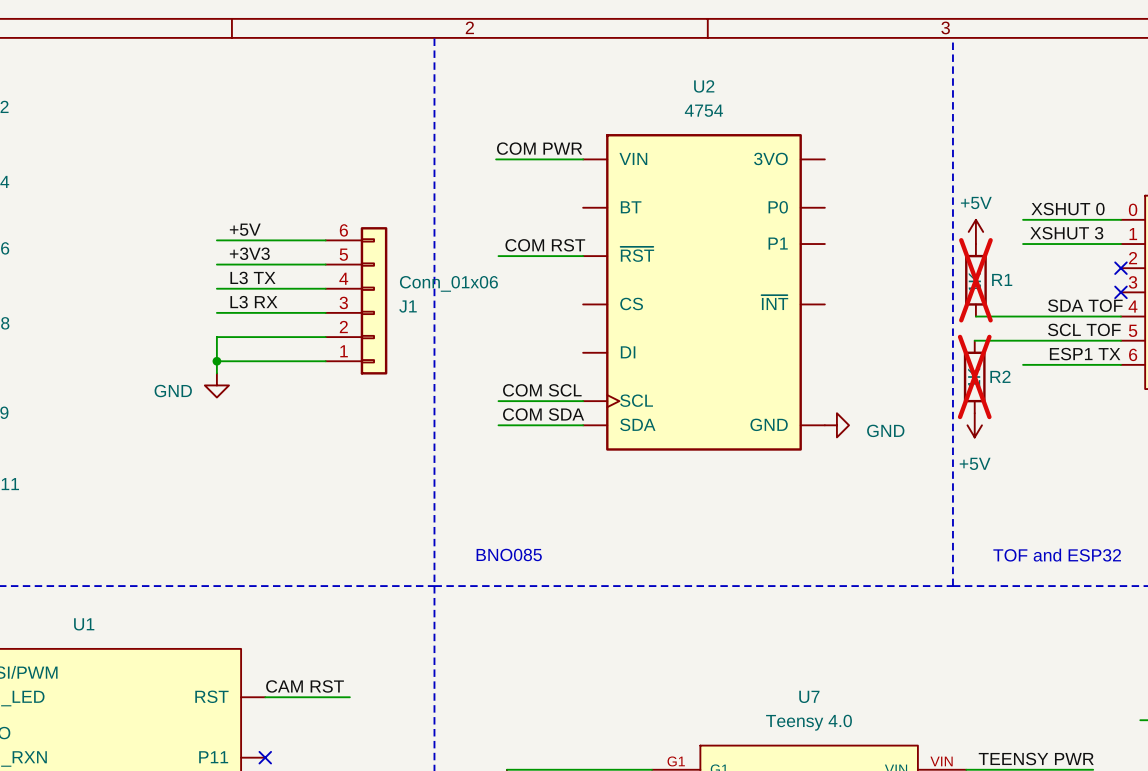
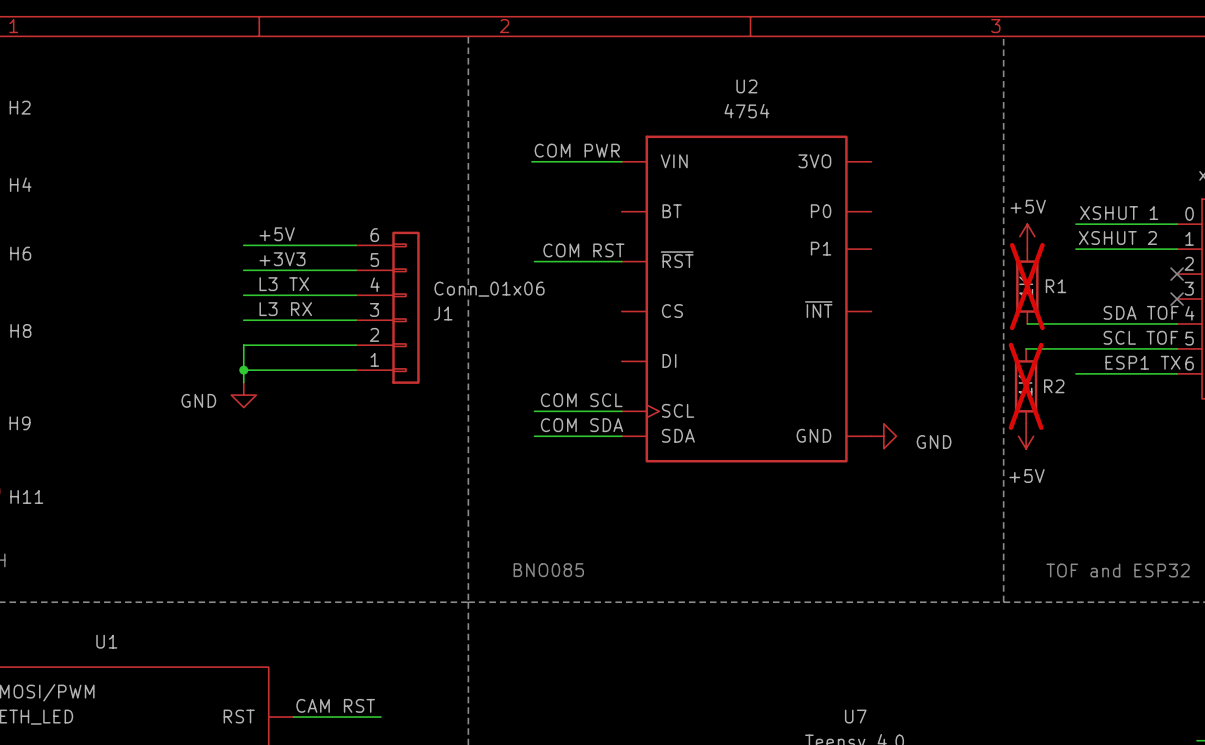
label: XSHUT 0 (1068, 209) -> XSHUT 1 (1119, 213)
label: XSHUT 3 (1066, 233) -> XSHUT 2 (1117, 237)

